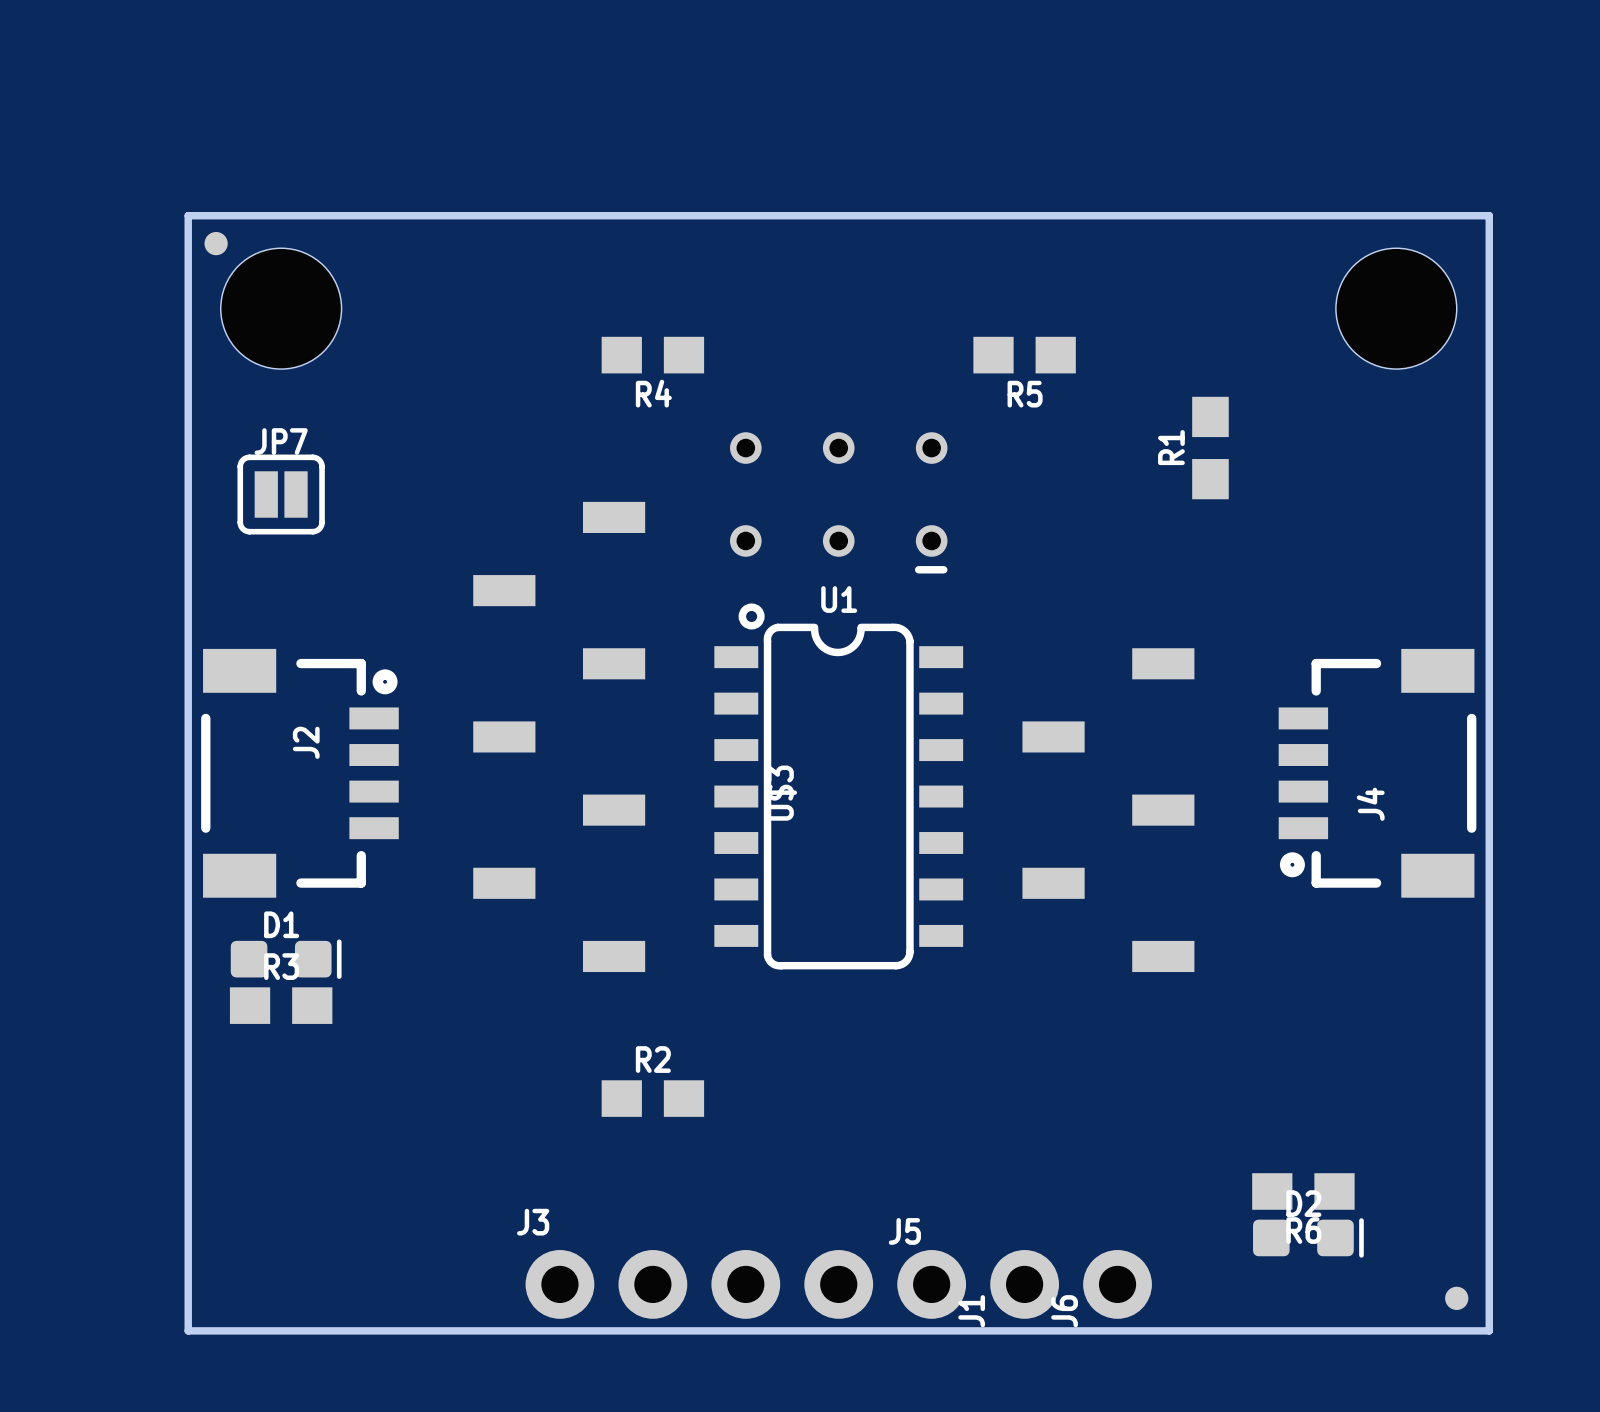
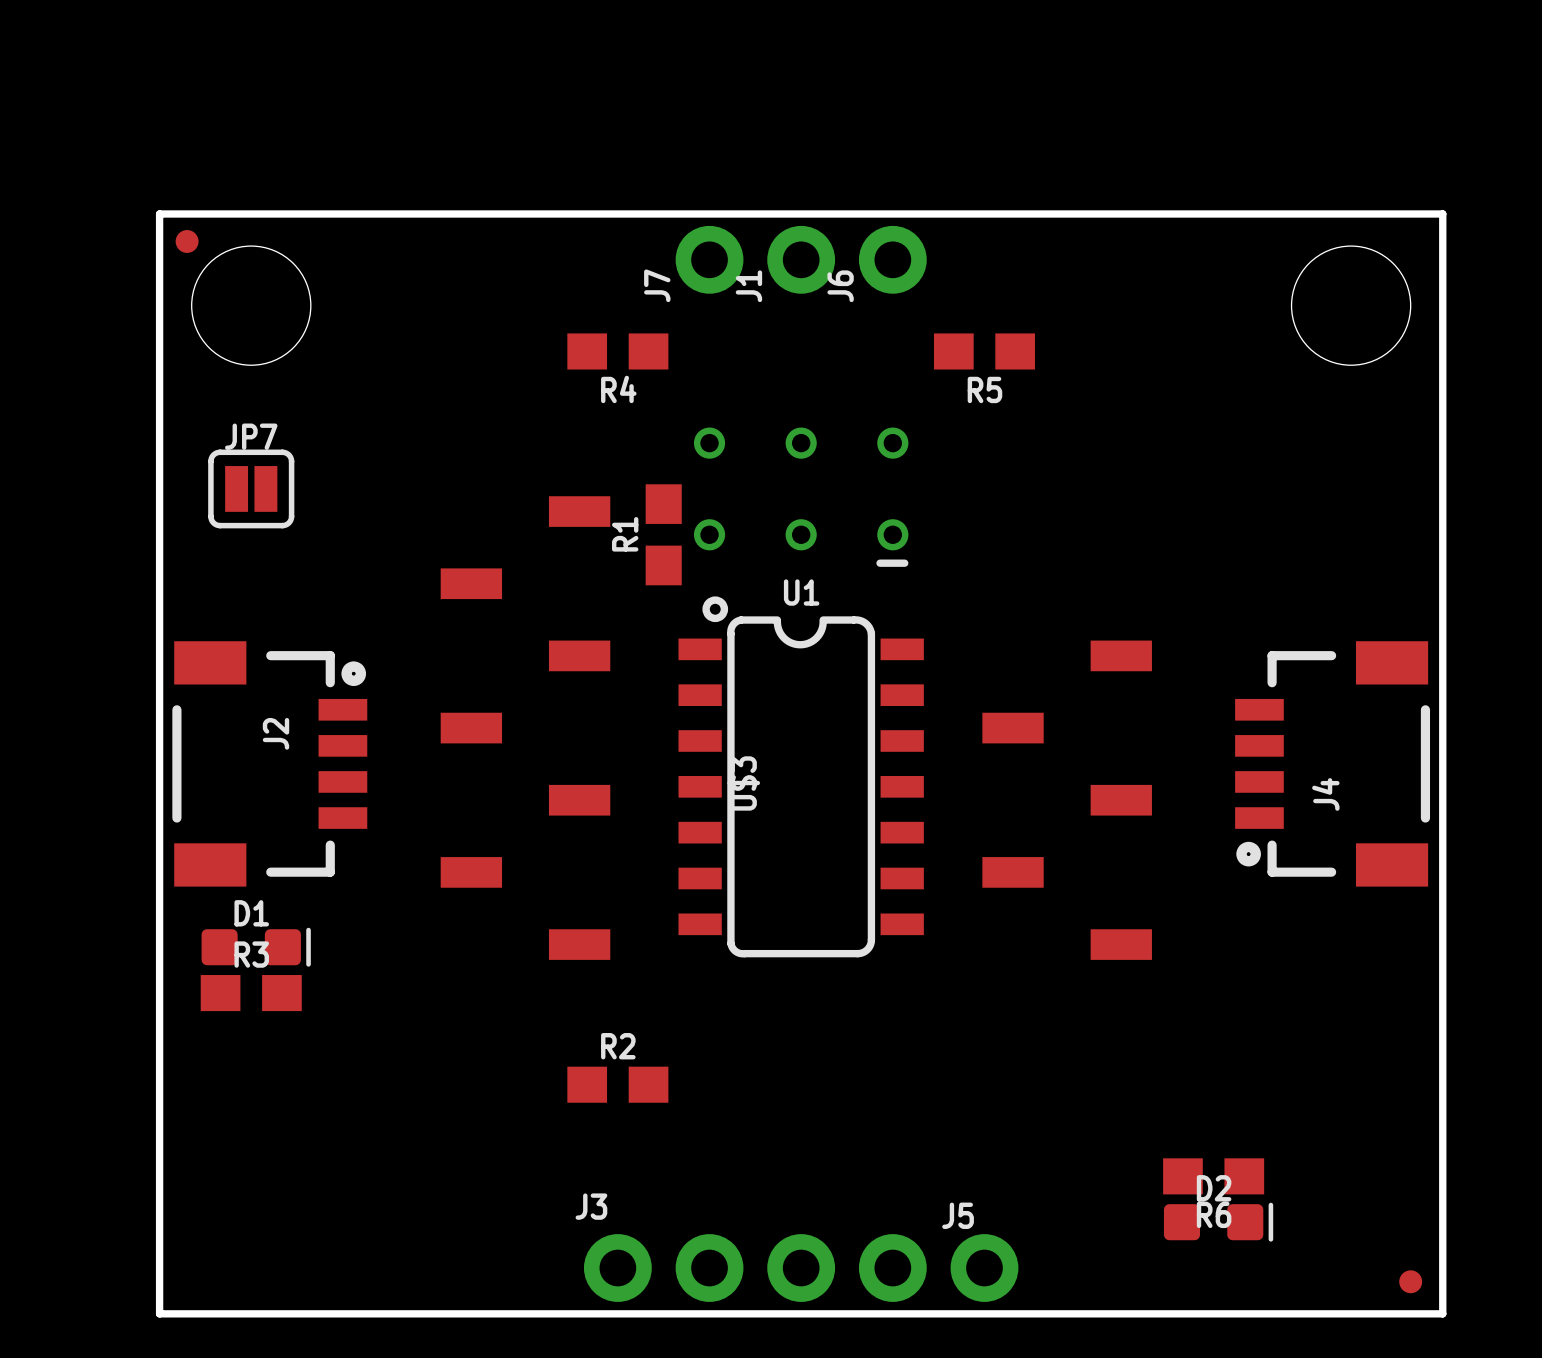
J7: none -> (709, 259)
J1: none -> (801, 259)
R1 position: (1210, 448) -> (663, 534)
R6 position: (1303, 1191) -> (1213, 1176)
D2 position: (1308, 1237) -> (1218, 1222)
J3 position: (699, 1284) -> (755, 1268)
J5: (931, 1284) -> none
J6 position: (1117, 1284) -> (892, 259)
J1 name: J1 (971, 1311) -> J5 (958, 1215)

